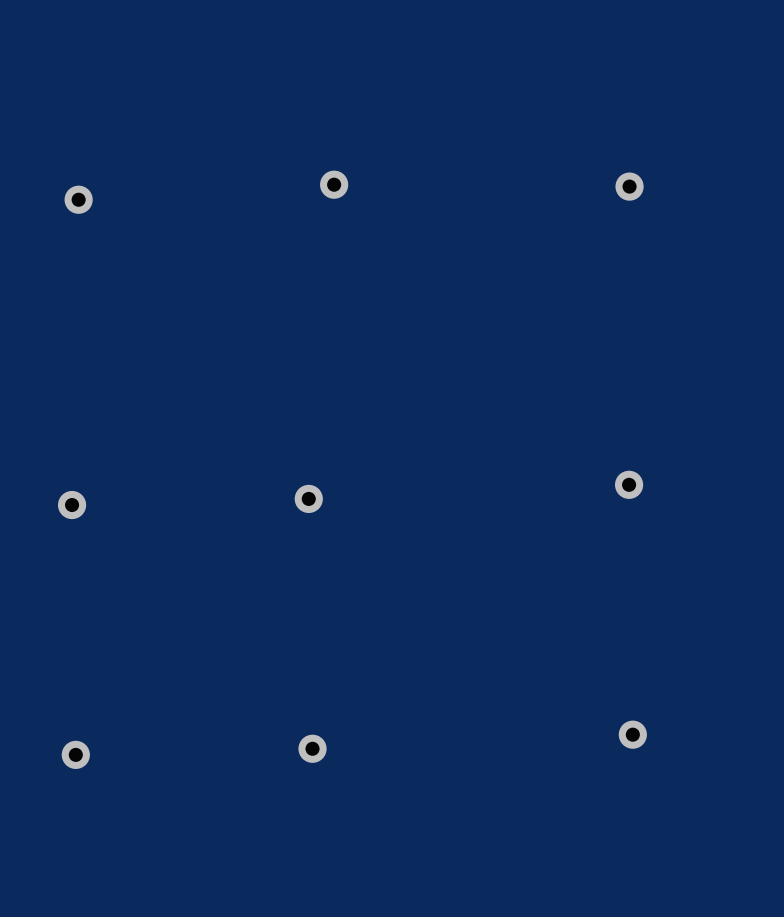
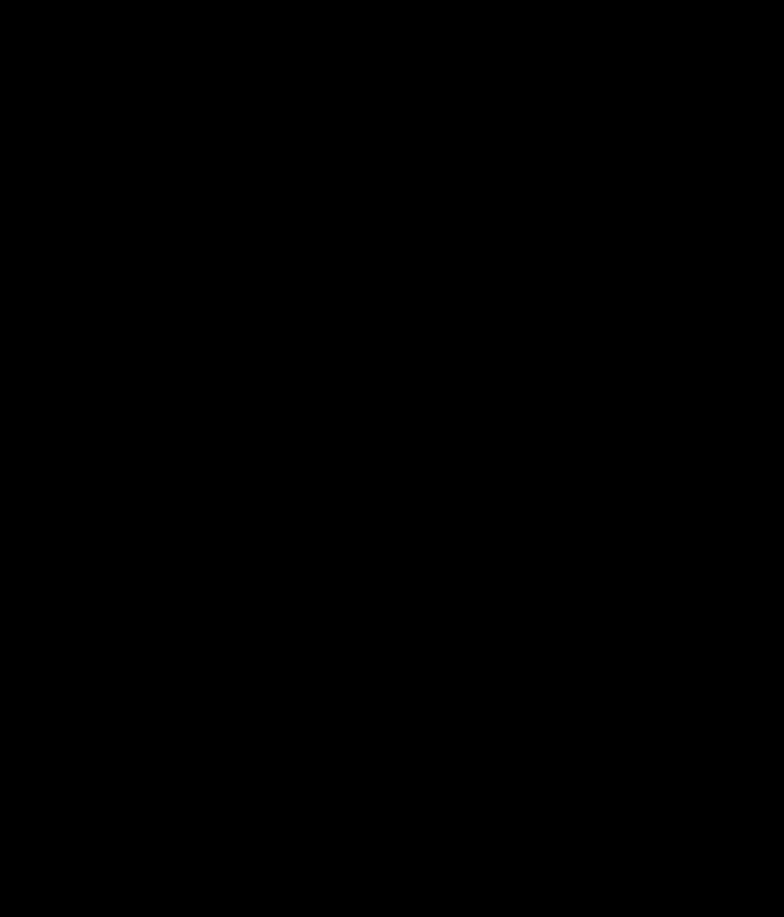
via: (334, 184) -> none
via: (629, 186) -> none
via: (78, 199) -> none
via: (629, 484) -> none
via: (308, 498) -> none
via: (72, 505) -> none
via: (632, 734) -> none
via: (312, 748) -> none
via: (75, 754) -> none

